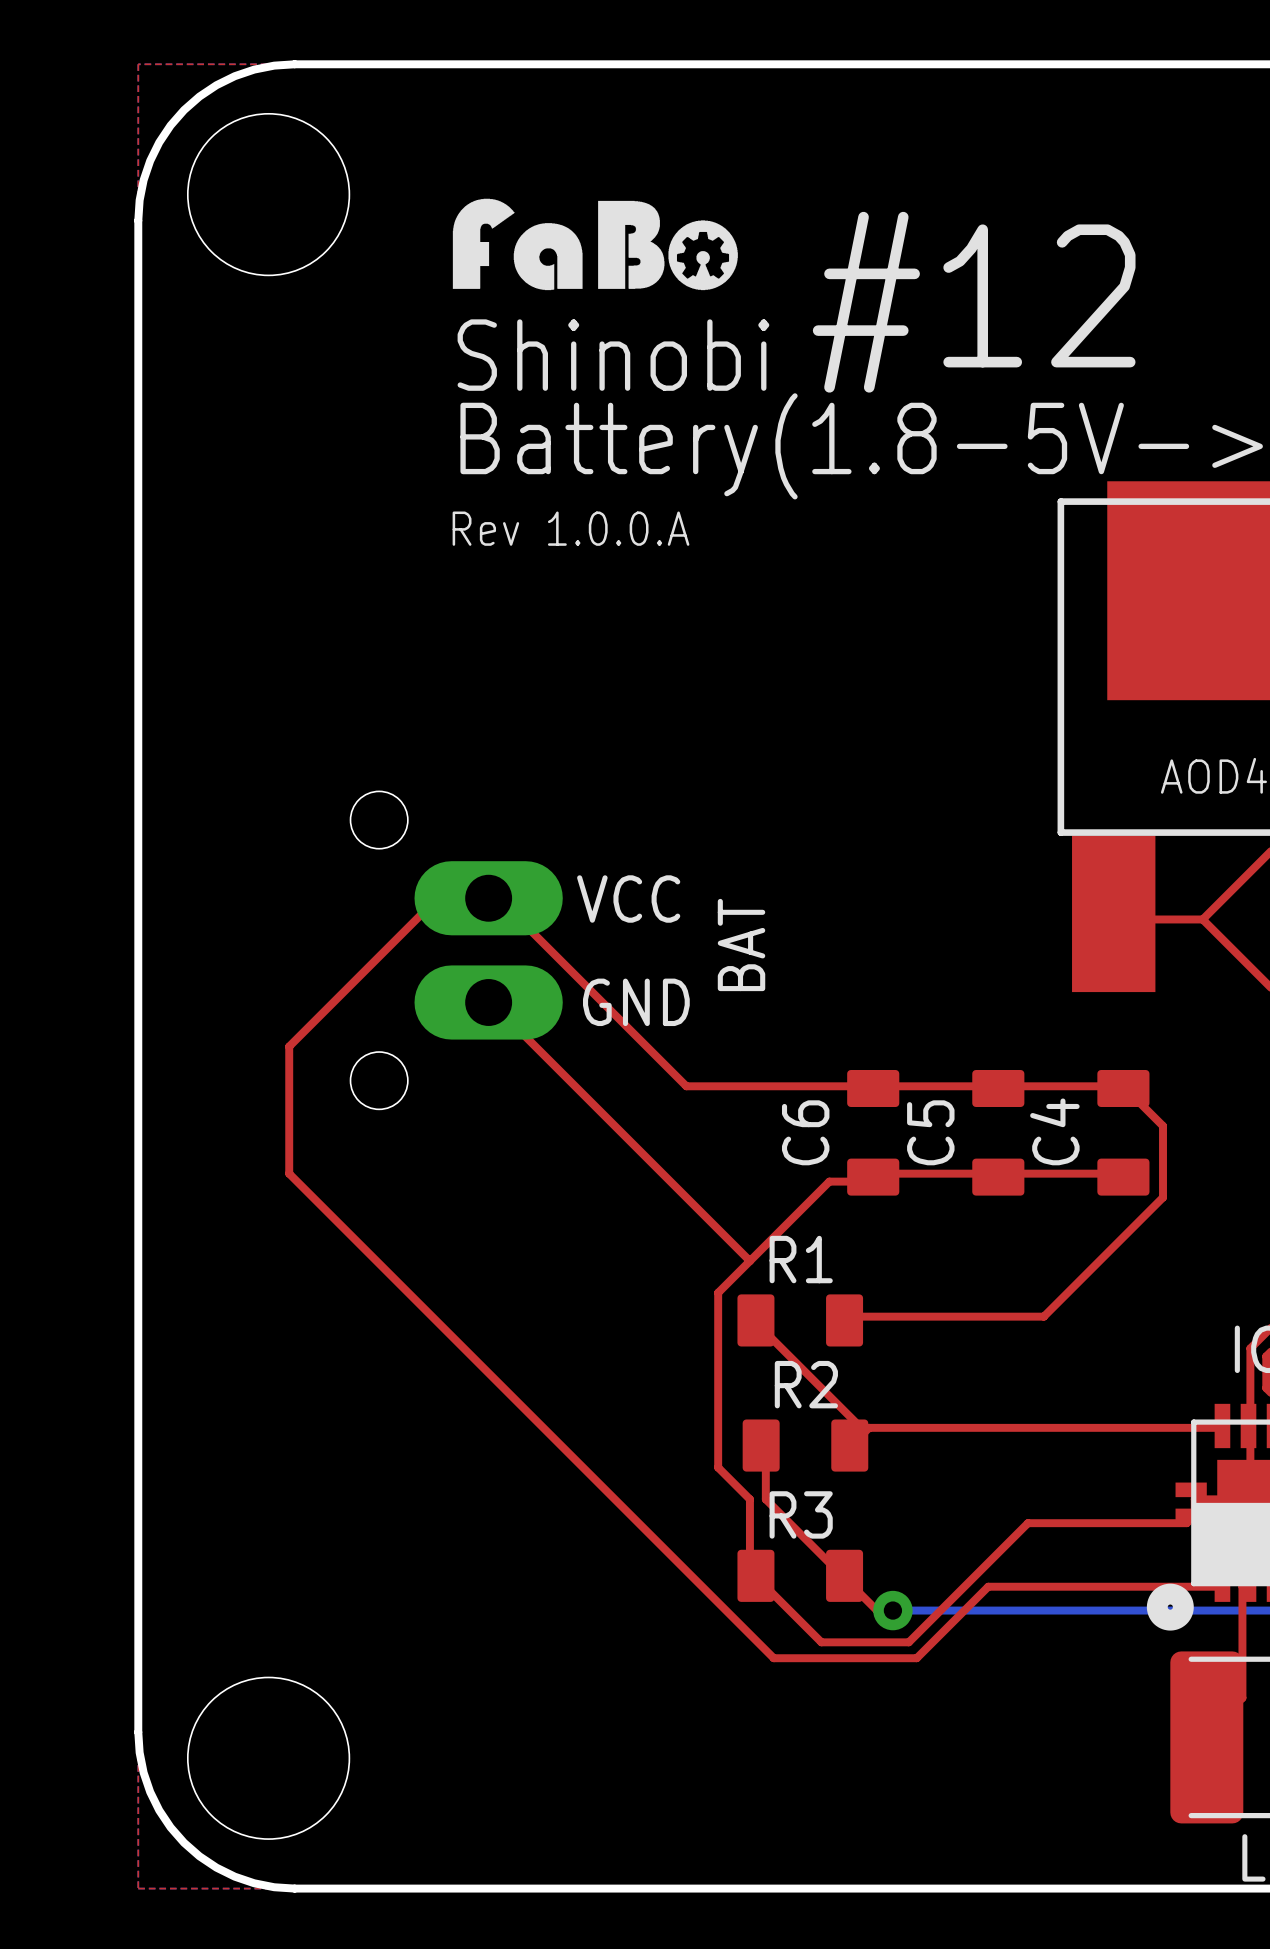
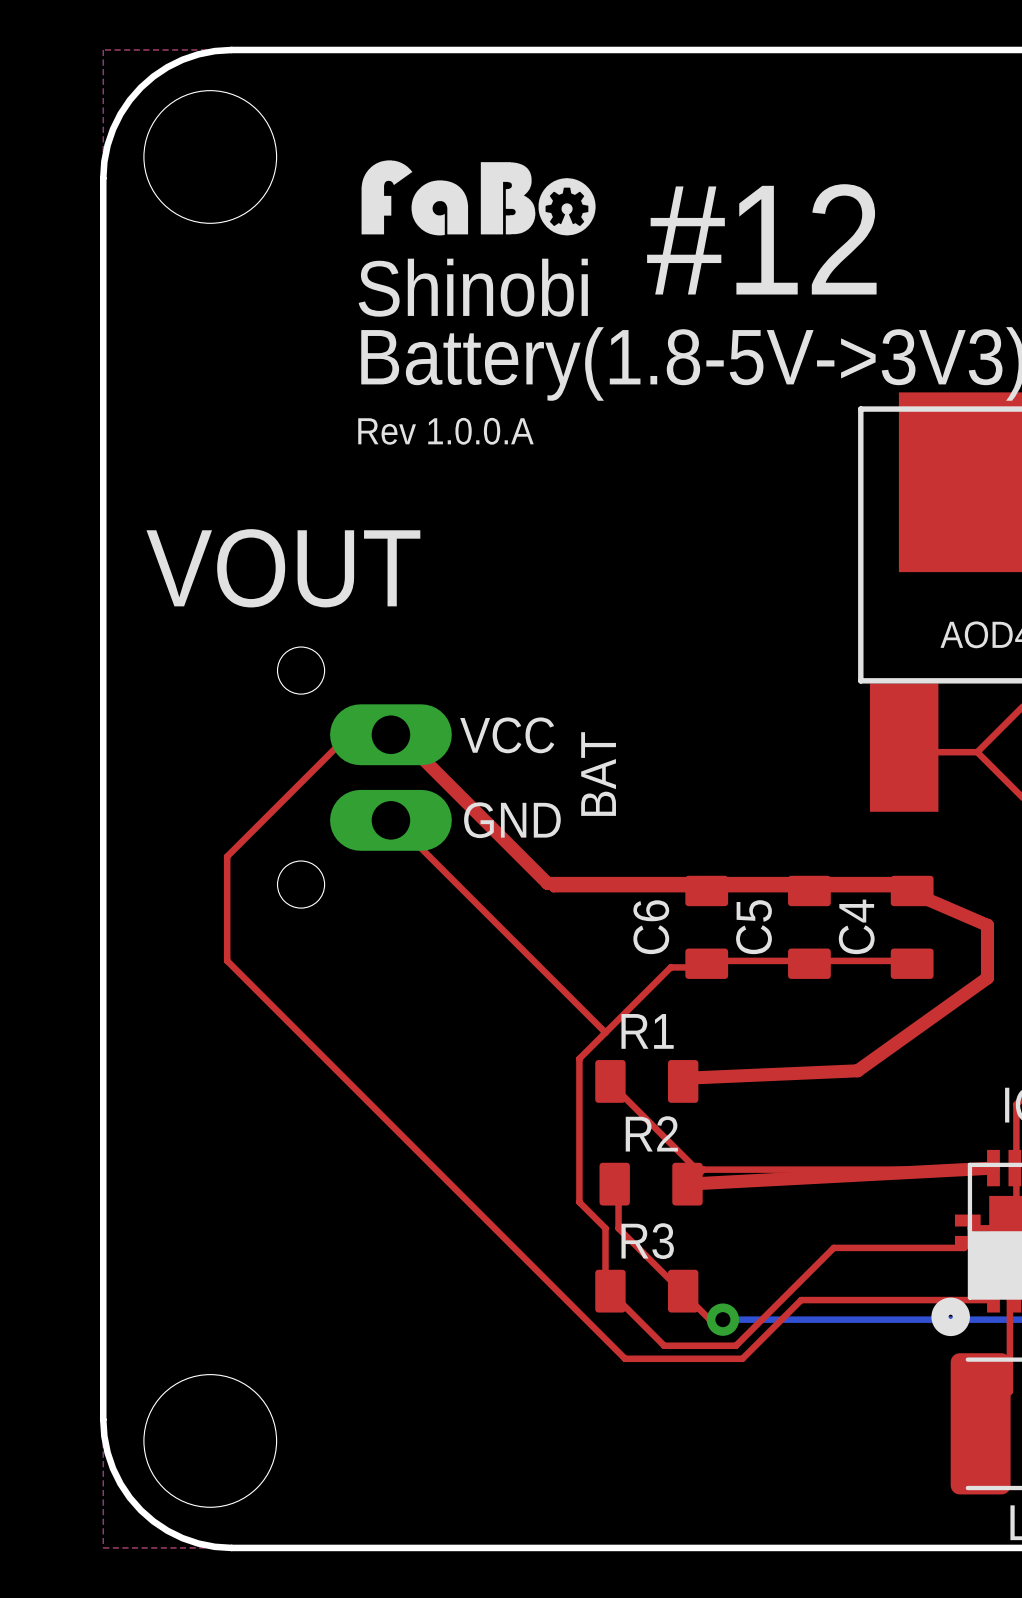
text: none -> VOUT (283, 568)
top track width: thin (498, 898) (679, 1079) -> thick (398, 734) (547, 883)
top track: none -> (547, 883) (906, 883) (912, 889)
top track: (1123, 1088) (1163, 1126) (1163, 1197) (1043, 1316) (845, 1316) -> (912, 890) (912, 892) (987, 925) (987, 978) (857, 1070) (683, 1078)
top track: none -> (993, 1168) (687, 1184)

